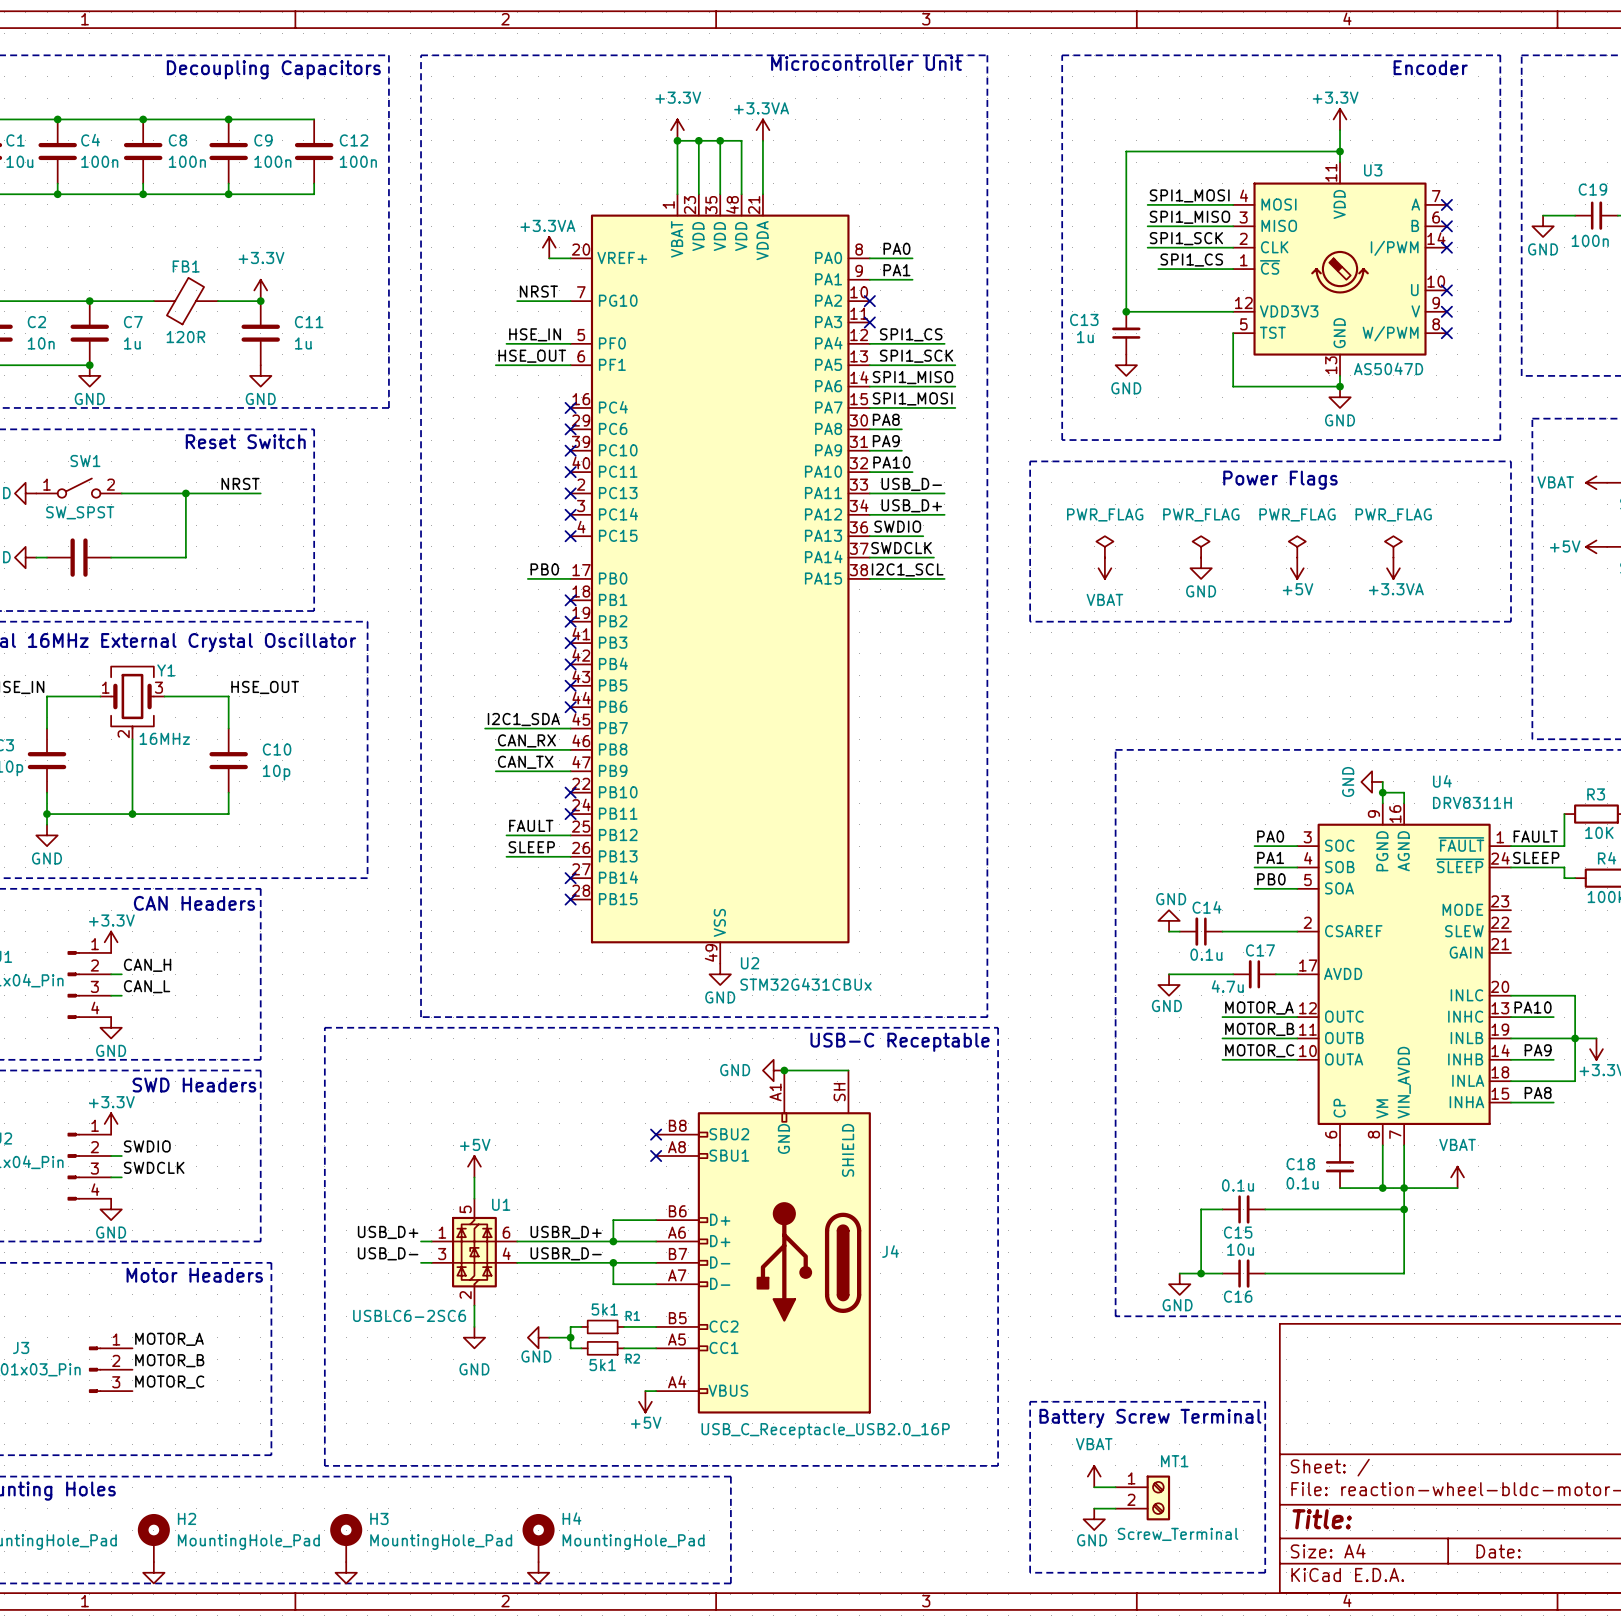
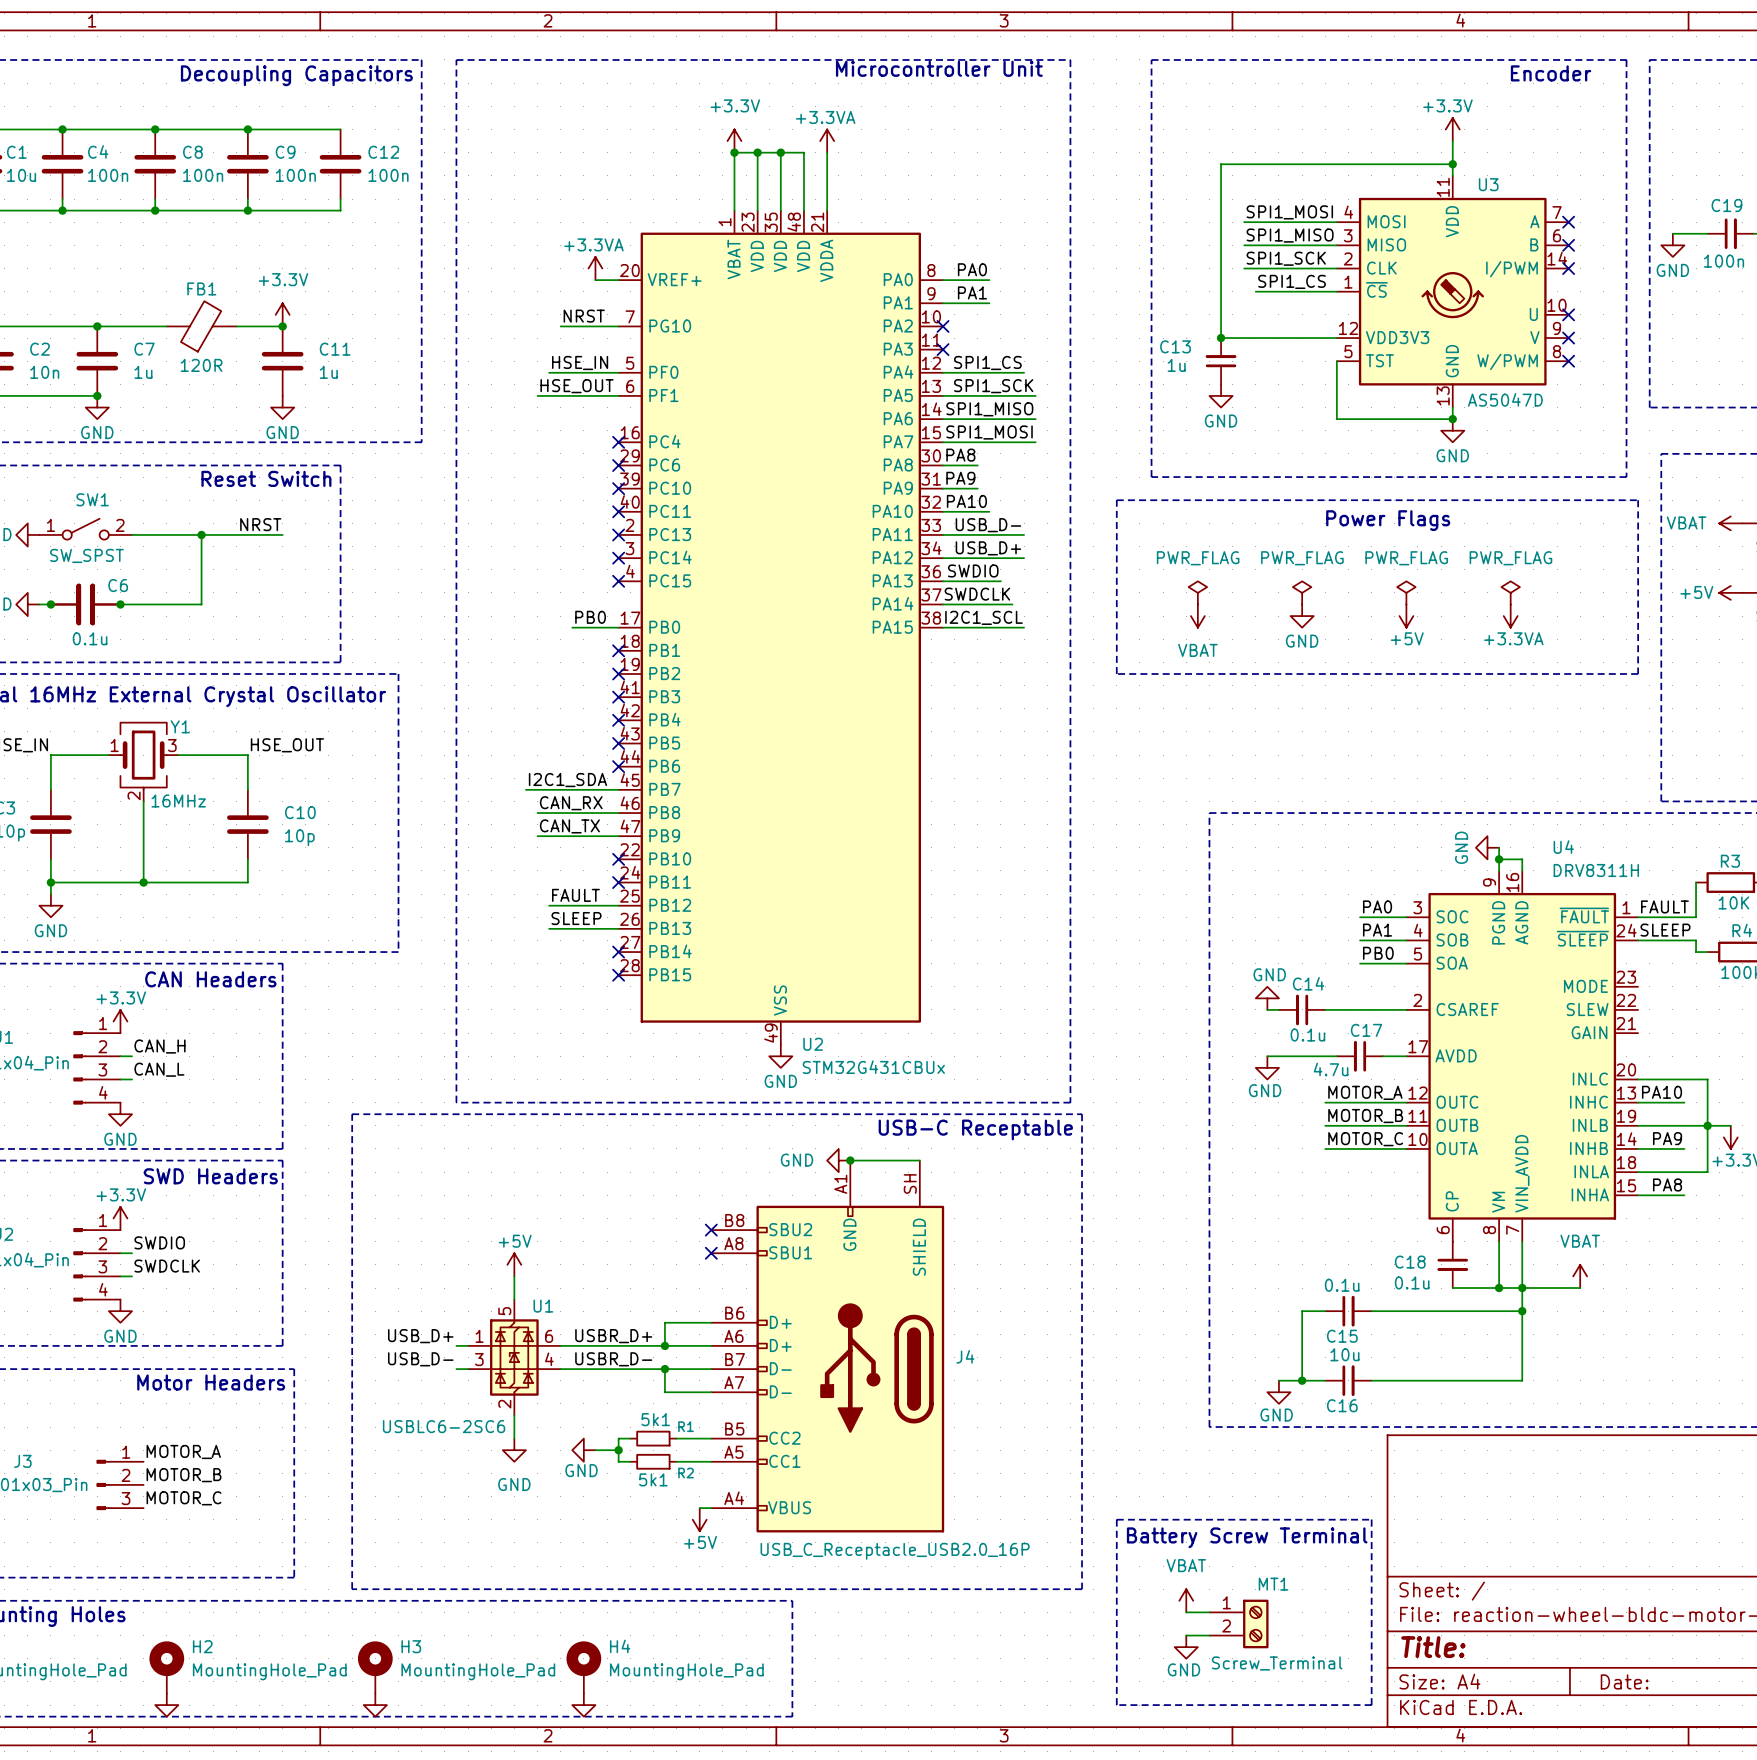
junction: none -> (50, 604)
C6: none -> 0.1u (85, 604)
junction: none -> (120, 604)

